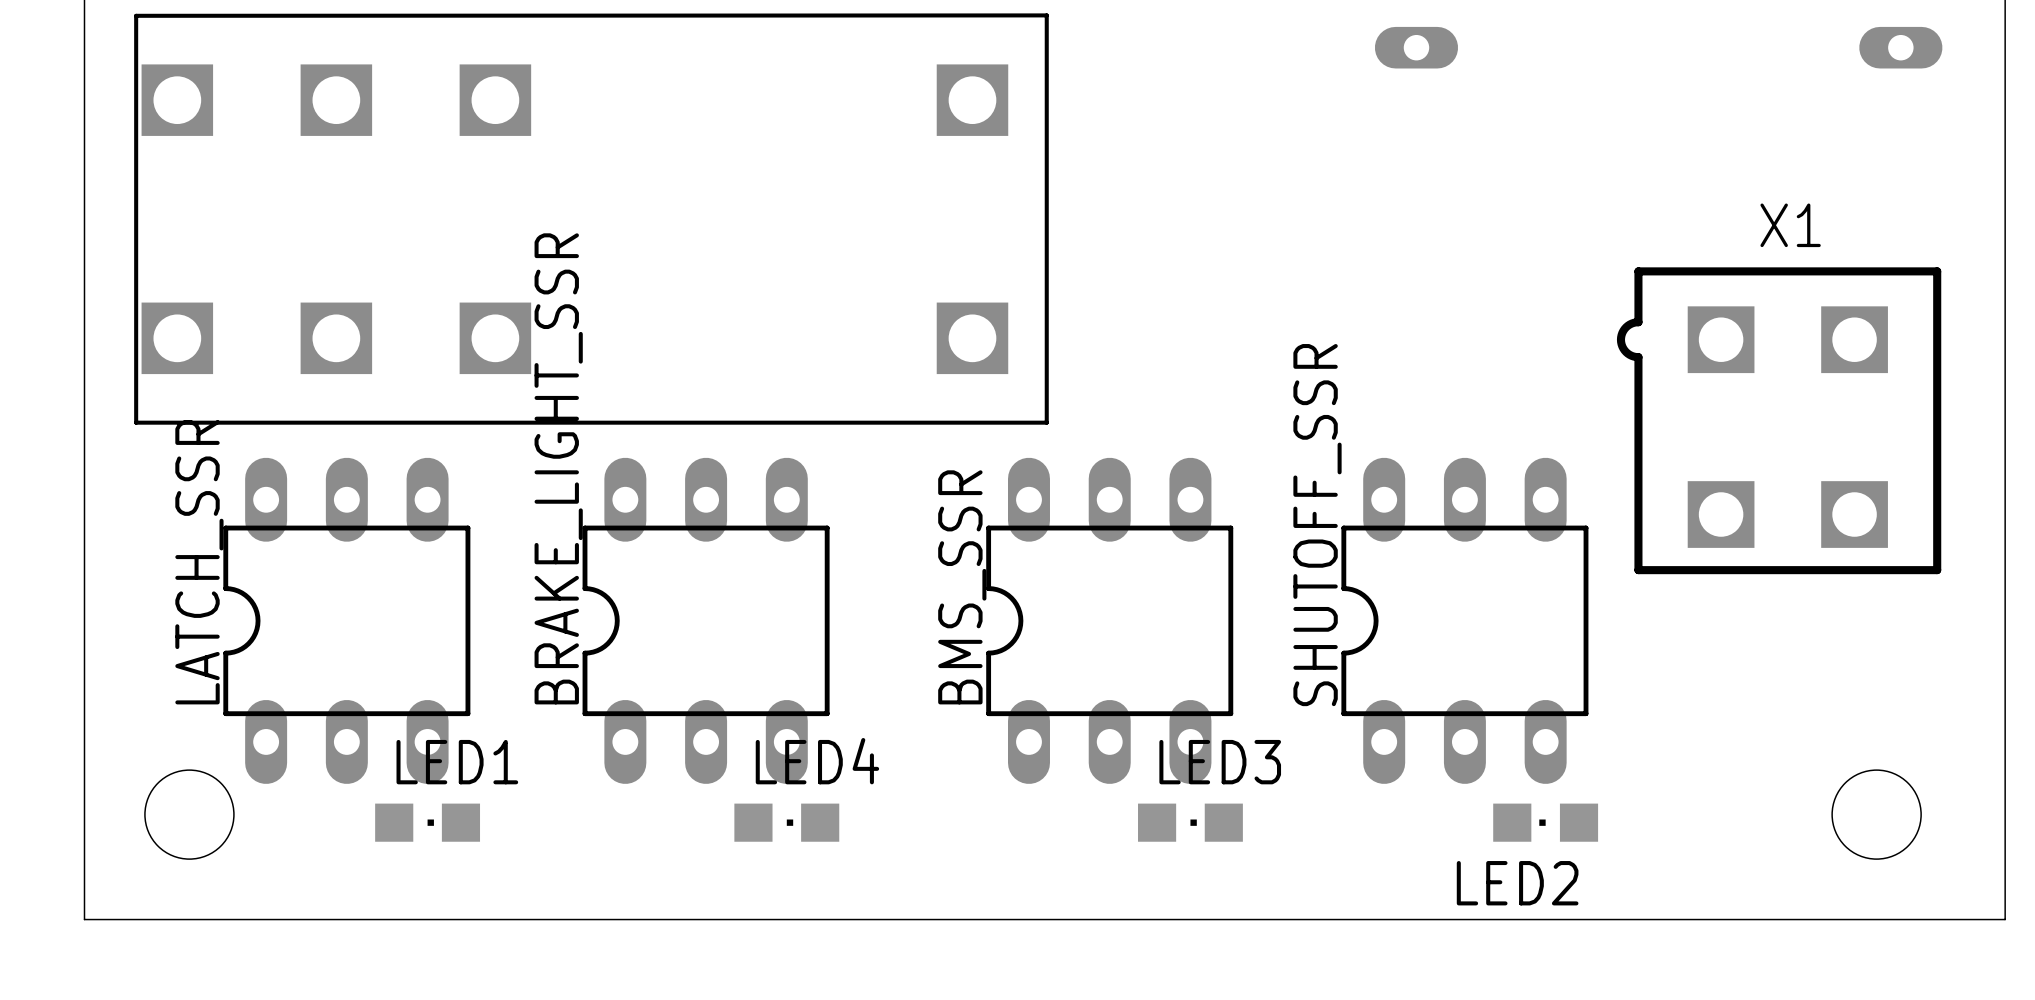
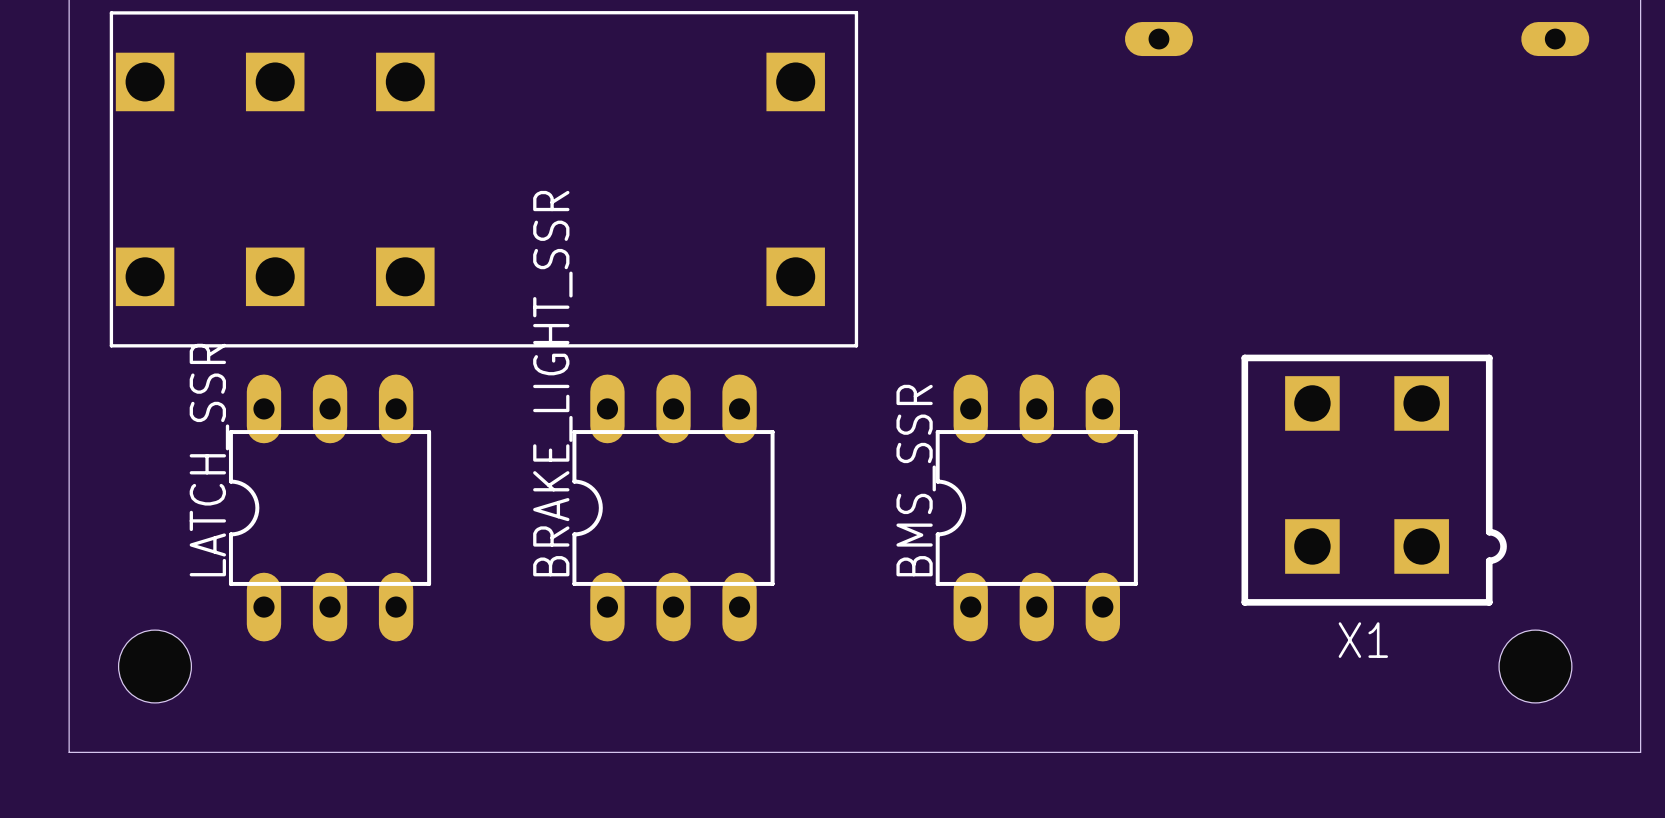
X1 rotation: 0° (1779, 420) -> 180° (1374, 480)
LATCH_SSR position: (346, 620) -> (330, 507)
BRAKE_LIGHT_SSR position: (706, 620) -> (673, 507)
BMS_SSR position: (1109, 620) -> (1036, 507)
SHUTOFF_SSR: (1464, 620) -> none
LED1: (427, 822) -> none
LED4: (786, 822) -> none
LED3: (1190, 822) -> none
LED2: (1545, 822) -> none

